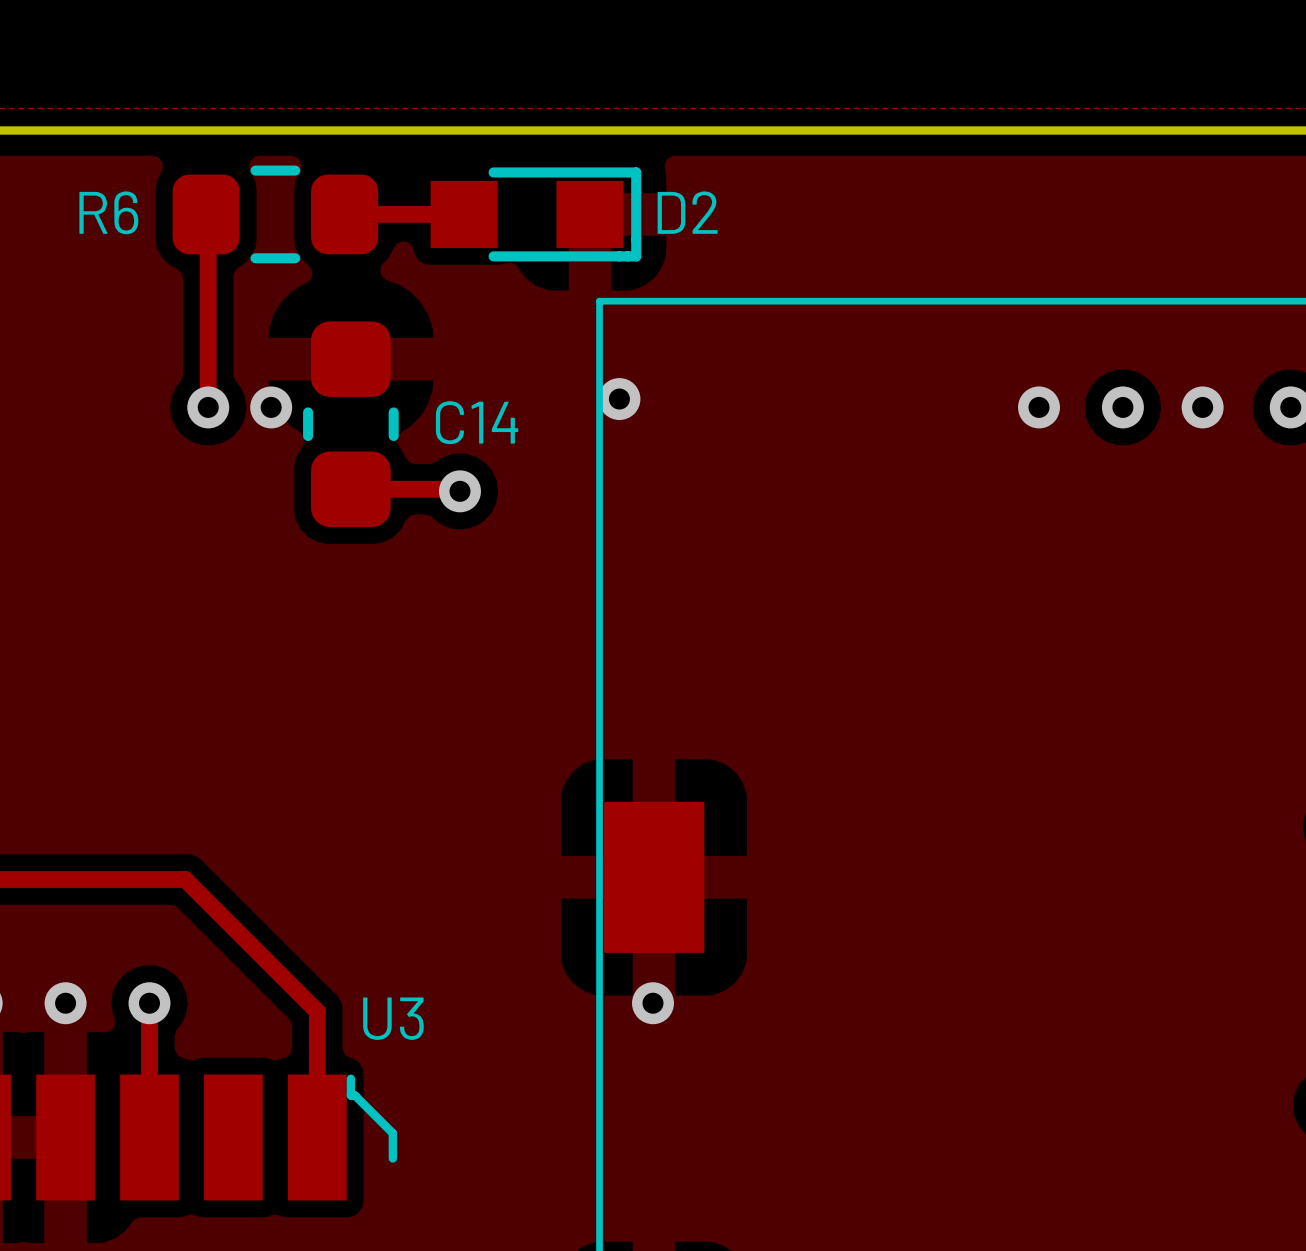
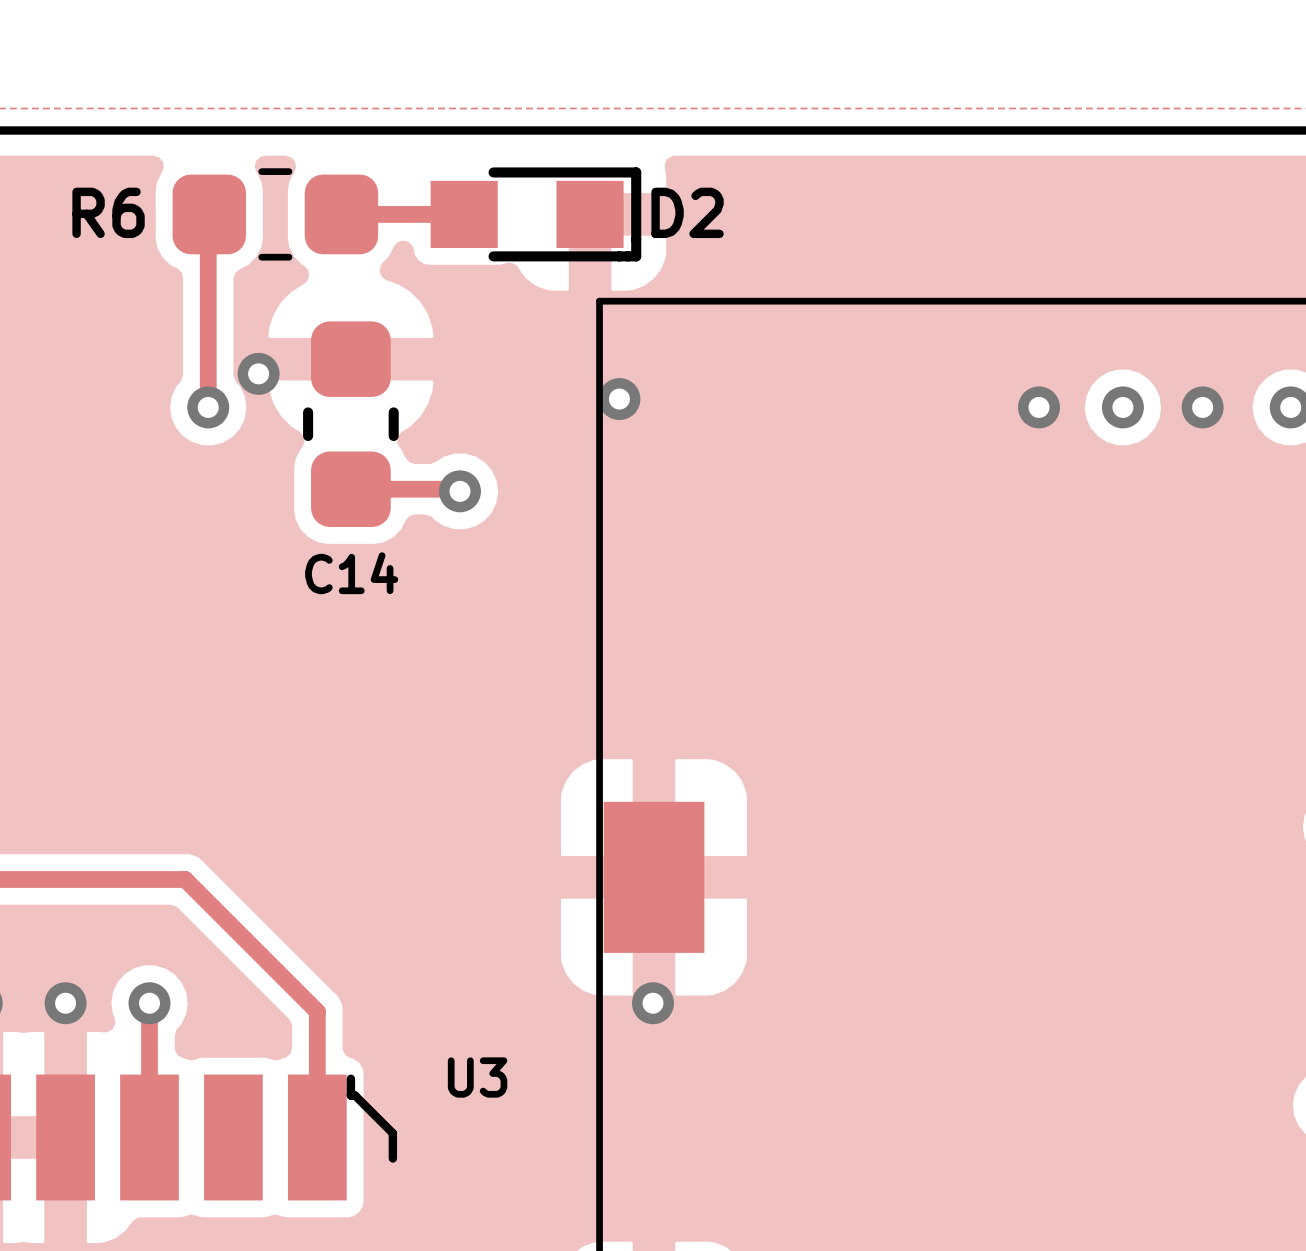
R6 footprint: [172, 165, 379, 264] -> [172, 168, 379, 261]
via position: (271, 407) -> (258, 373)
C14 name position: C14 (477, 422) -> C14 (351, 573)
U3 name position: U3 (393, 1018) -> U3 (477, 1077)

